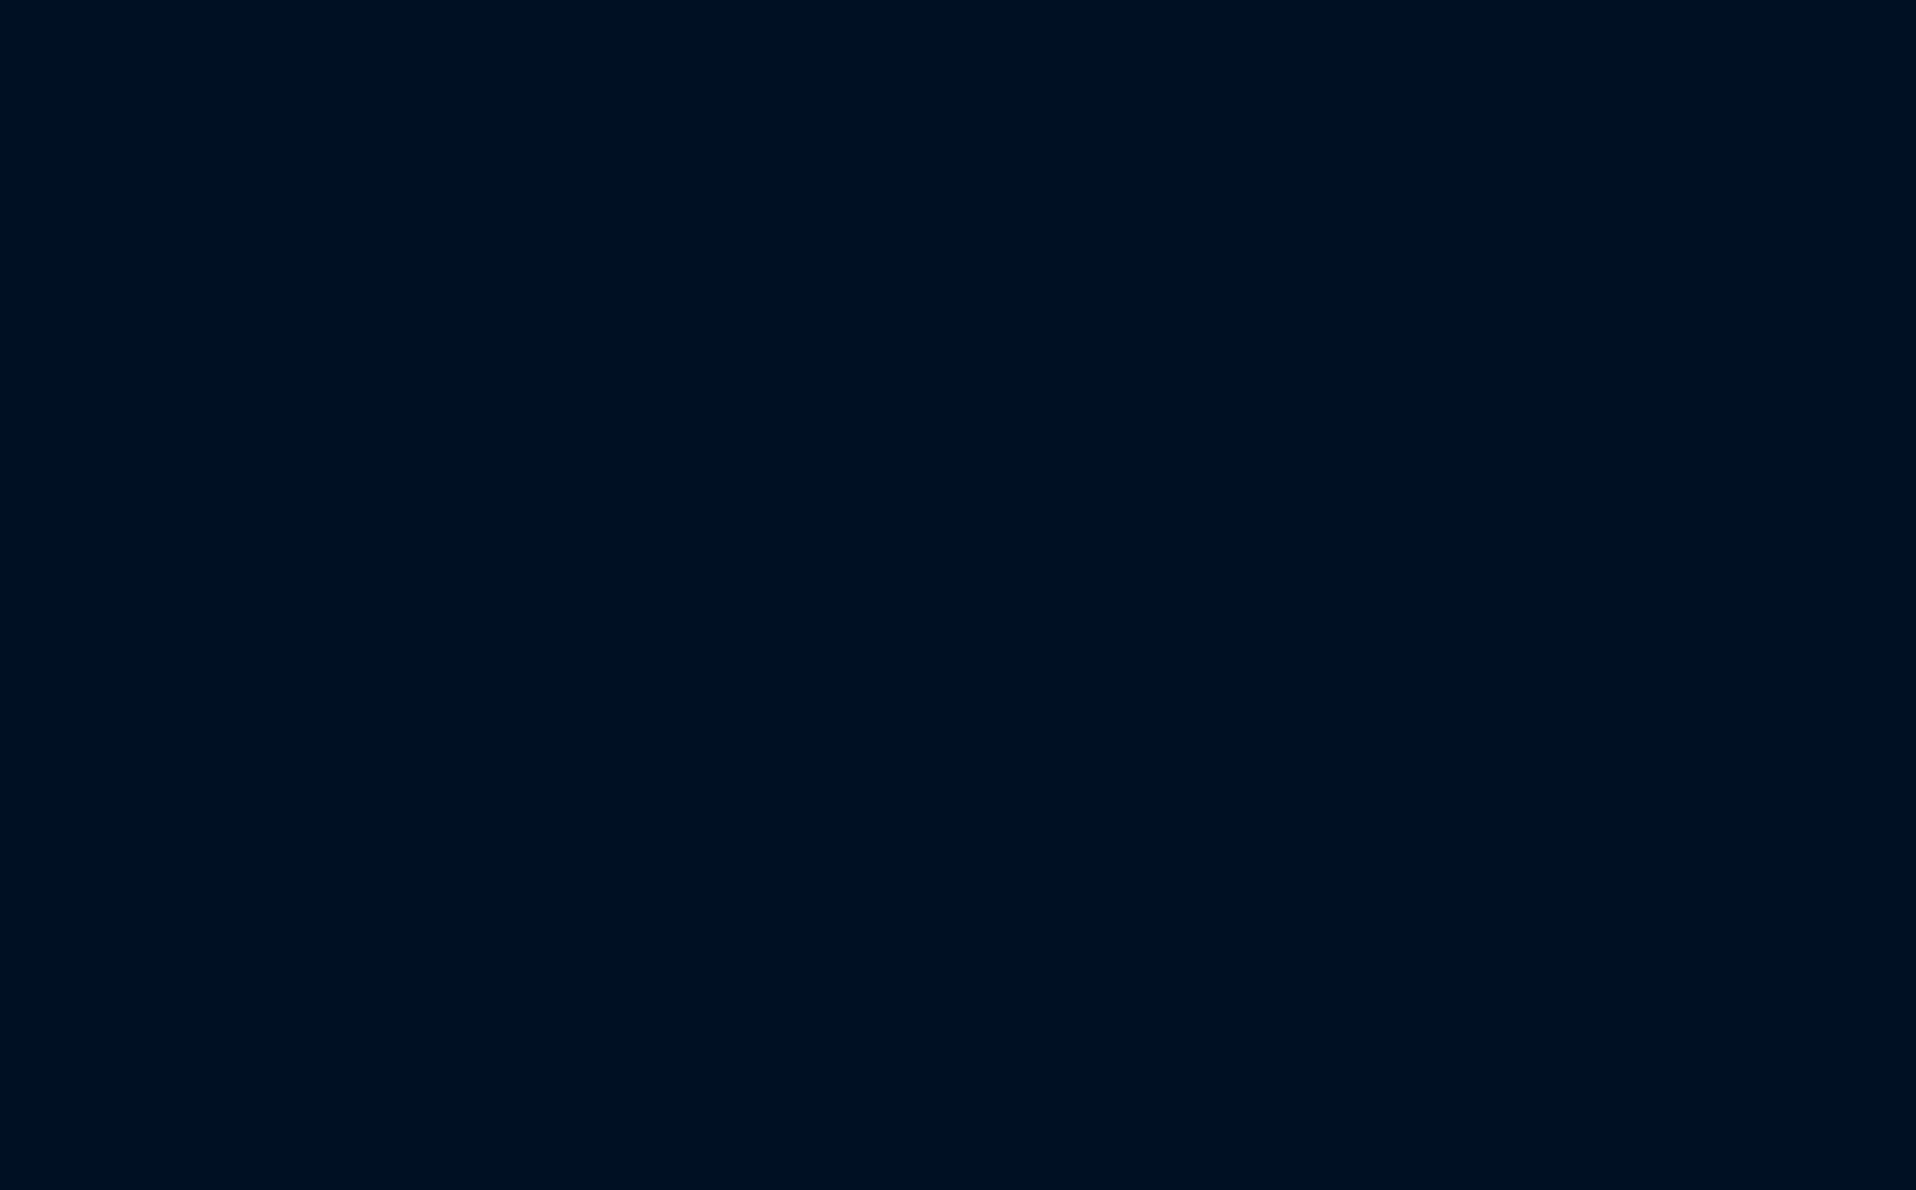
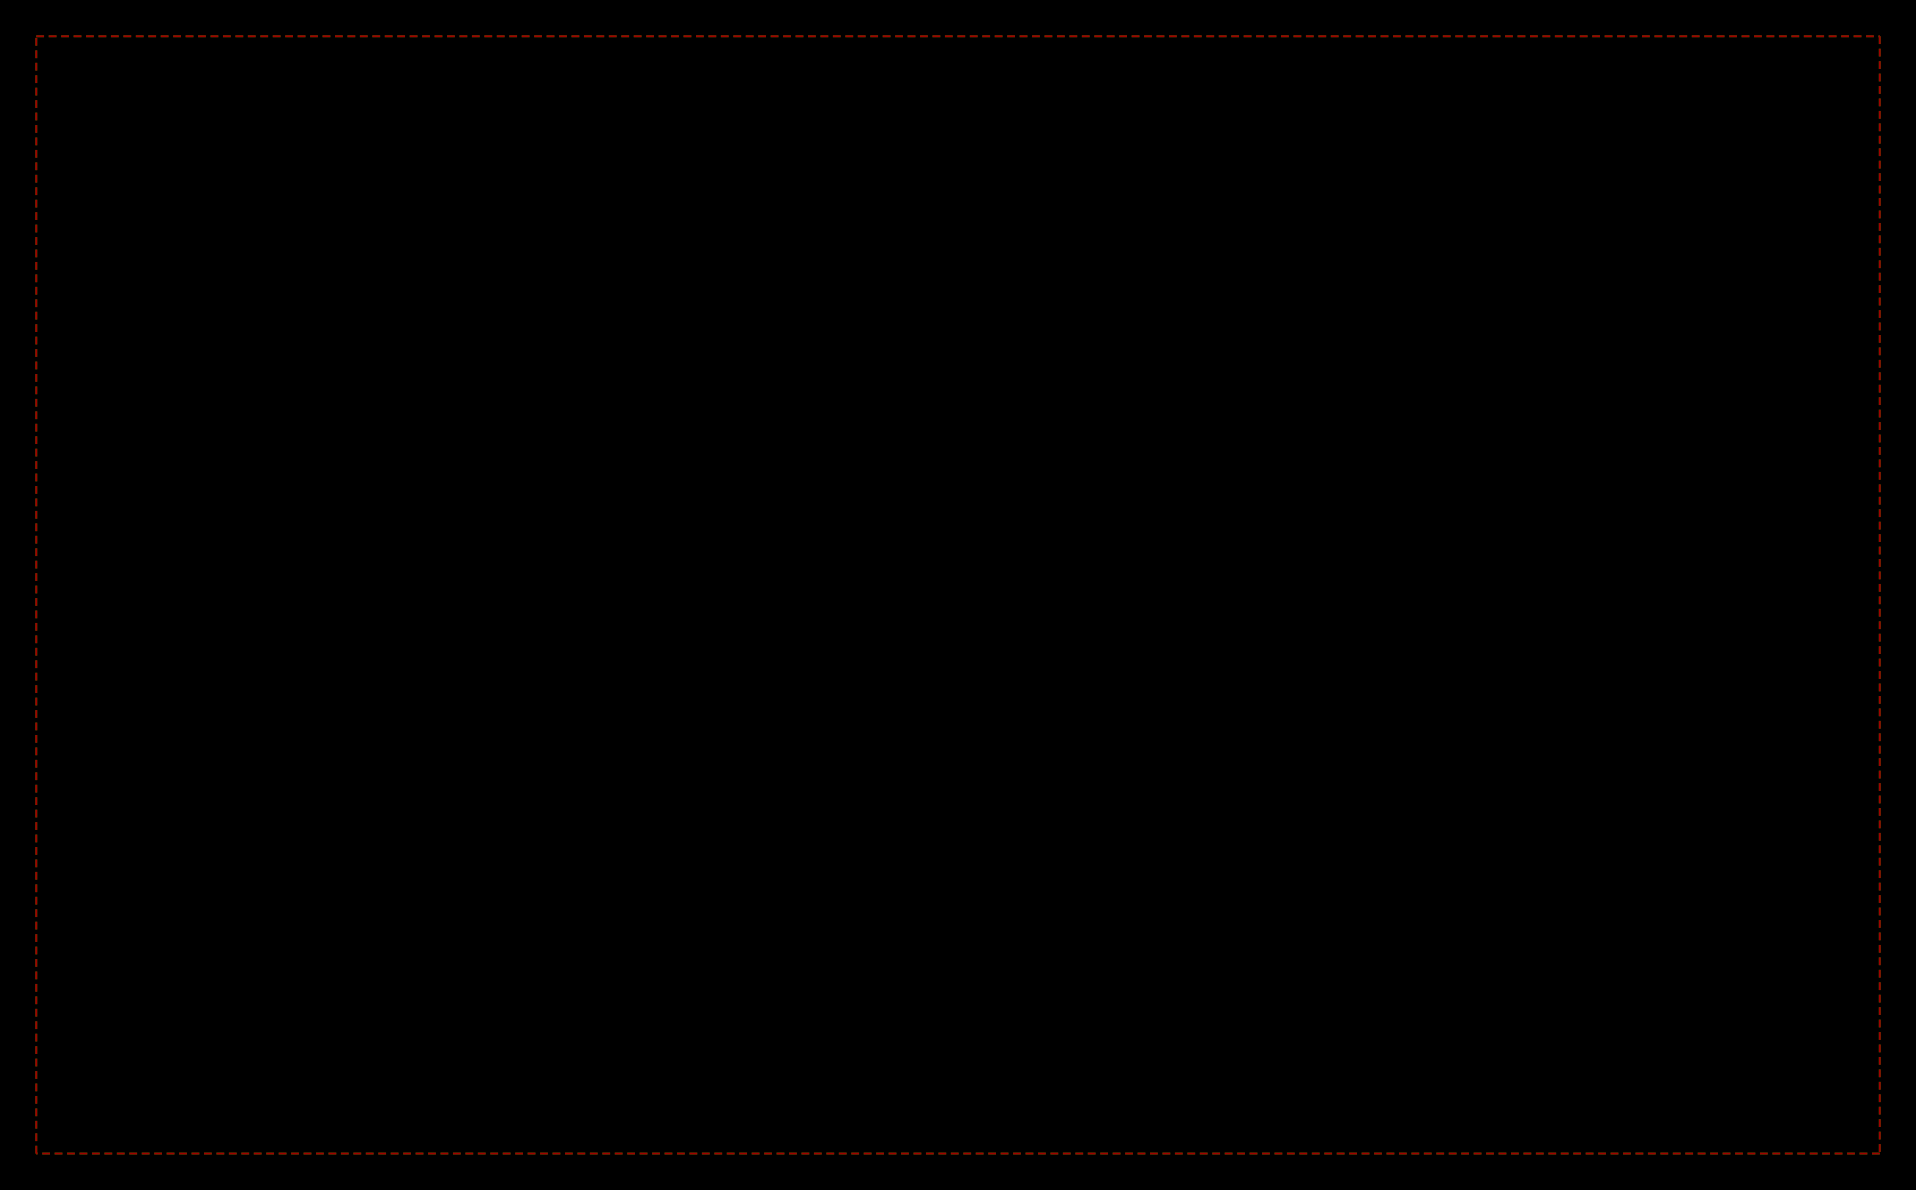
top zone outline: none -> (36, 36) (36, 1153) (1879, 1153) (1879, 36) (36, 36)

